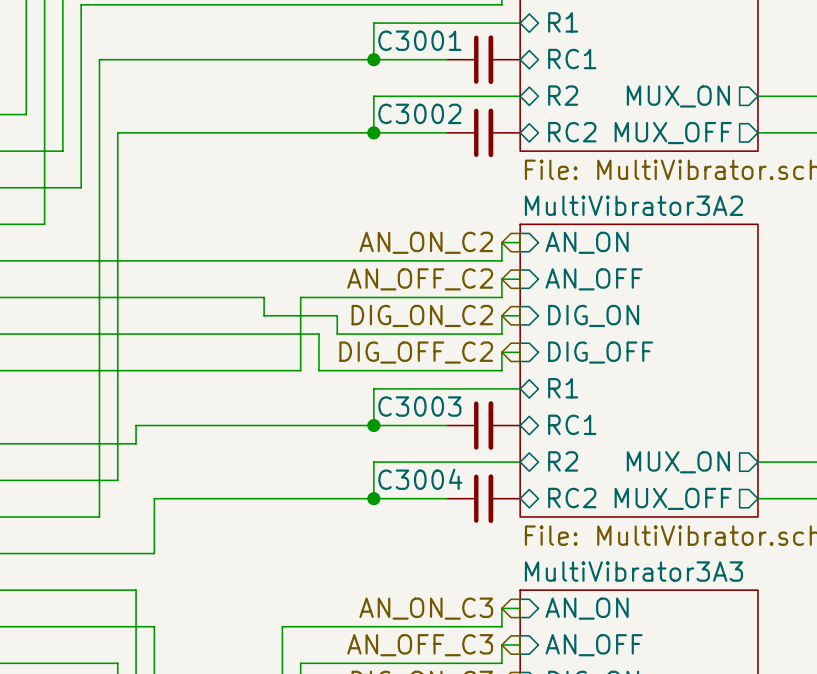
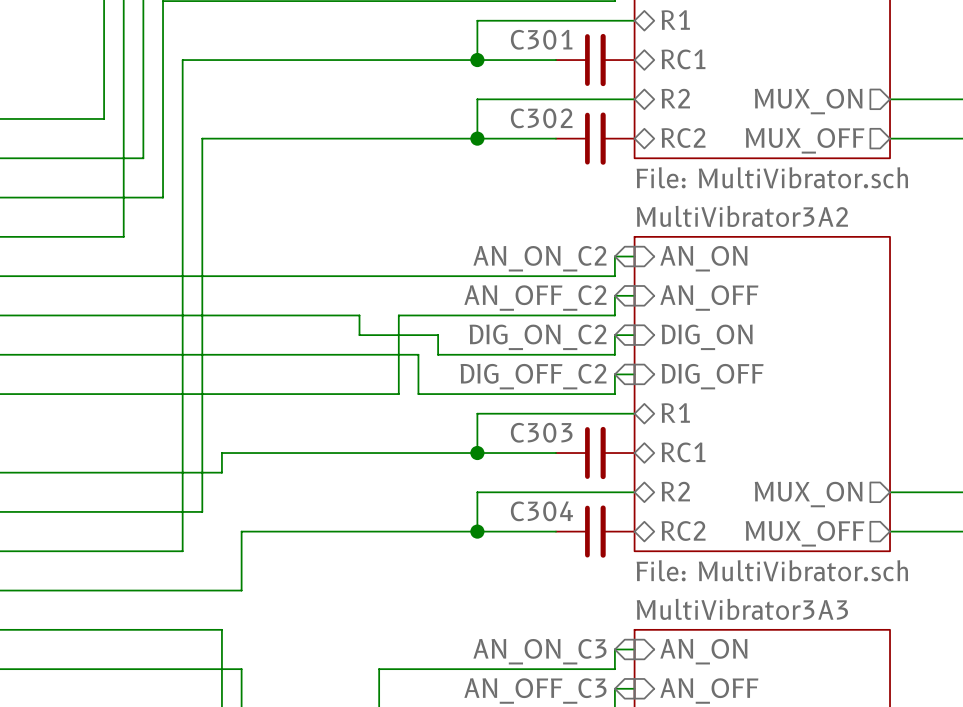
C3001 name: C3001 (419, 40) -> C301 (541, 39)
C3002 name: C3002 (419, 113) -> C302 (541, 118)
C3003 name: C3003 (419, 406) -> C303 (541, 432)
C3004 name: C3004 (420, 479) -> C304 (541, 511)

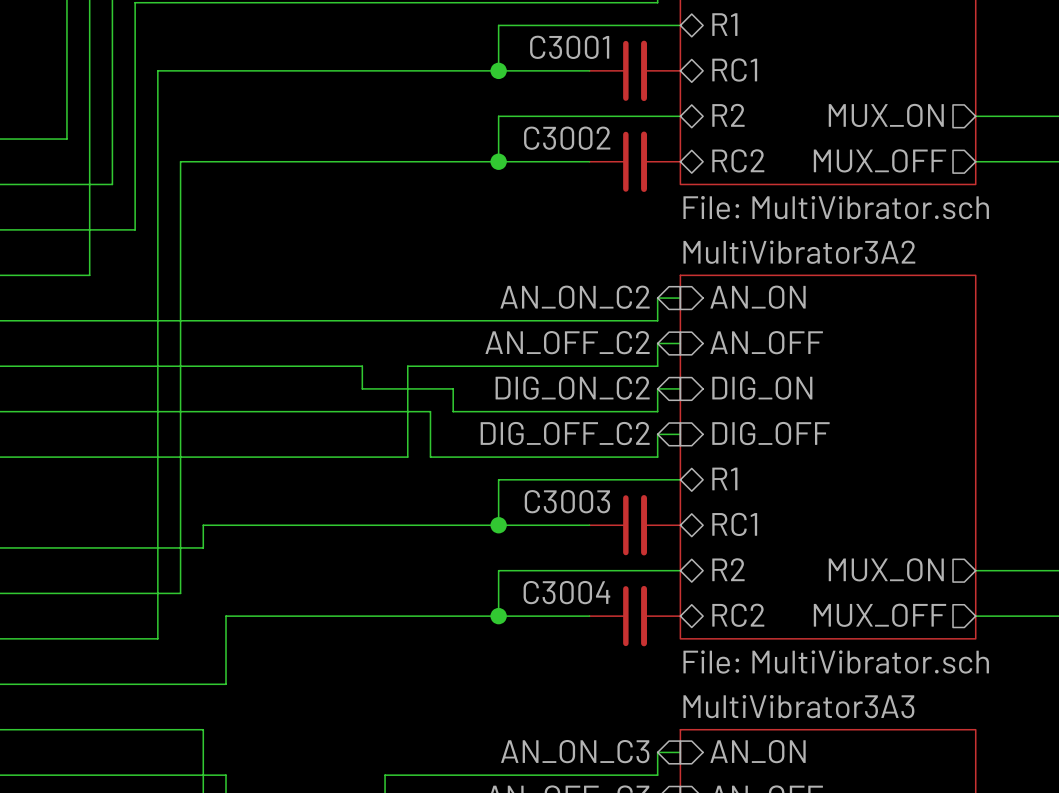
C301 name: C301 (541, 39) -> C3001 (569, 47)
C302 name: C302 (541, 118) -> C3002 (567, 138)
C303 name: C303 (541, 432) -> C3003 (567, 501)
C304 name: C304 (541, 511) -> C3004 (566, 592)

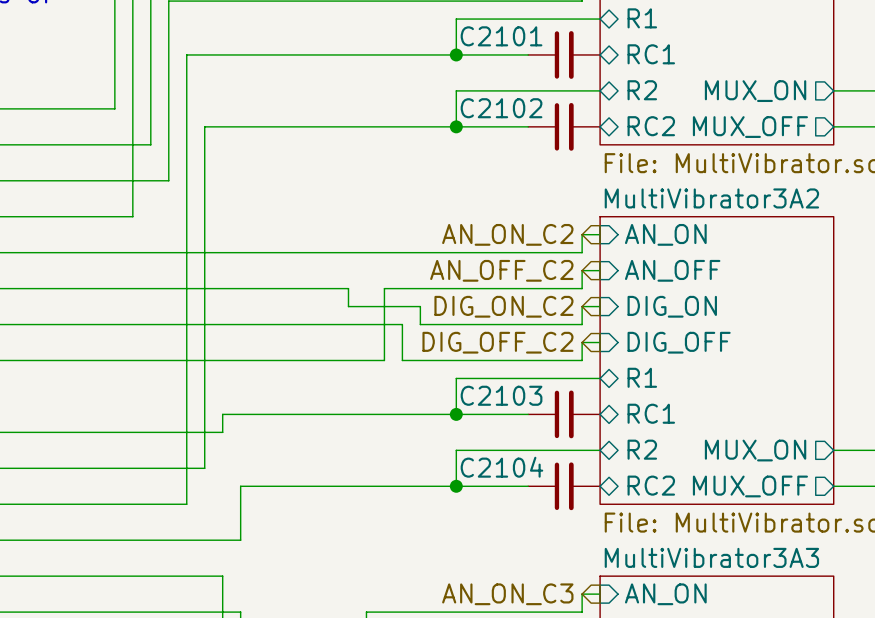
C3001 name: C3001 (569, 47) -> C2101 (501, 36)
C3002 name: C3002 (567, 138) -> C2102 (501, 108)
C3003 name: C3003 (567, 501) -> C2103 (501, 395)
C3004 name: C3004 (566, 592) -> C2104 (501, 467)

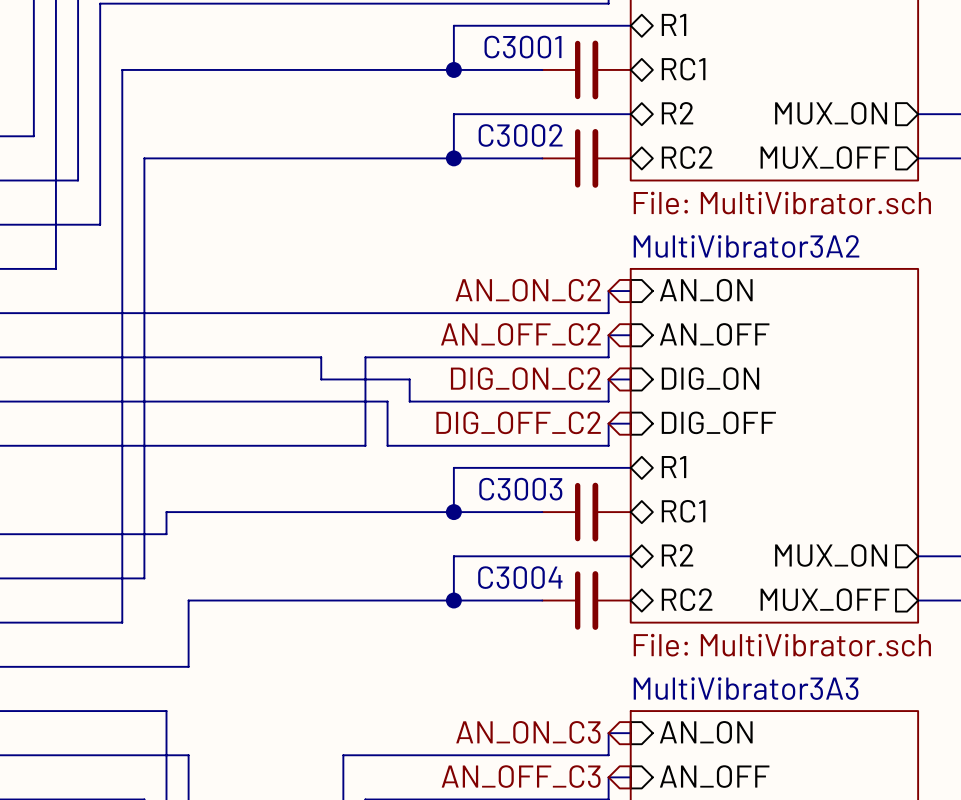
C2101 name: C2101 (501, 36) -> C3001 (523, 47)
C2102 name: C2102 (501, 108) -> C3002 (520, 135)
C2103 name: C2103 (501, 395) -> C3003 (520, 489)
C2104 name: C2104 (501, 467) -> C3004 (520, 577)

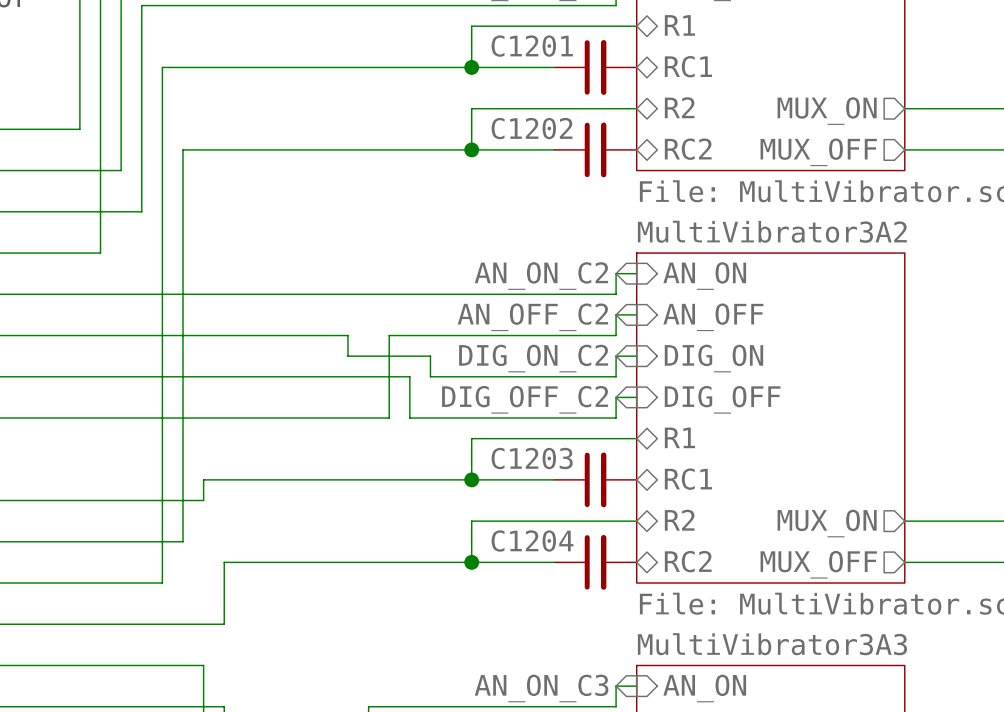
C3001 name: C3001 (523, 47) -> C1201 (532, 46)
C3002 name: C3002 (520, 135) -> C1202 (532, 128)
C3003 name: C3003 (520, 489) -> C1203 (532, 458)
C3004 name: C3004 (520, 577) -> C1204 (532, 541)

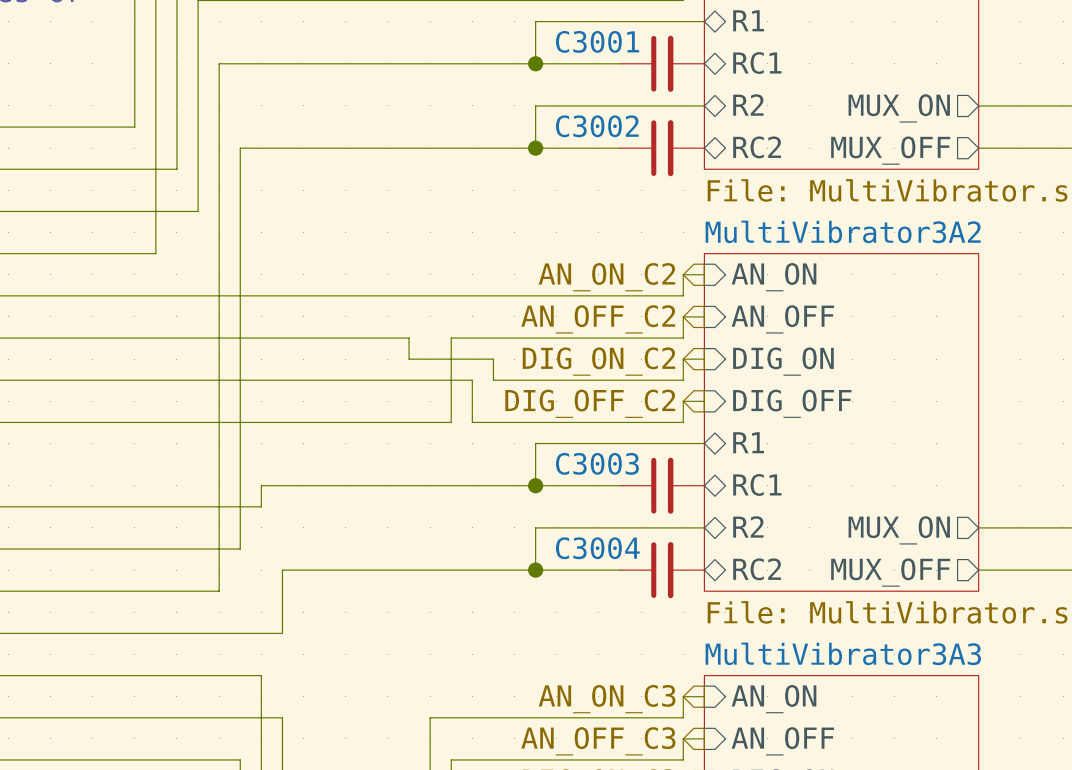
C1201 name: C1201 (532, 46) -> C3001 (597, 41)
C1202 name: C1202 (532, 128) -> C3002 (597, 126)
C1203 name: C1203 (532, 458) -> C3003 (597, 463)
C1204 name: C1204 (532, 541) -> C3004 (597, 548)

